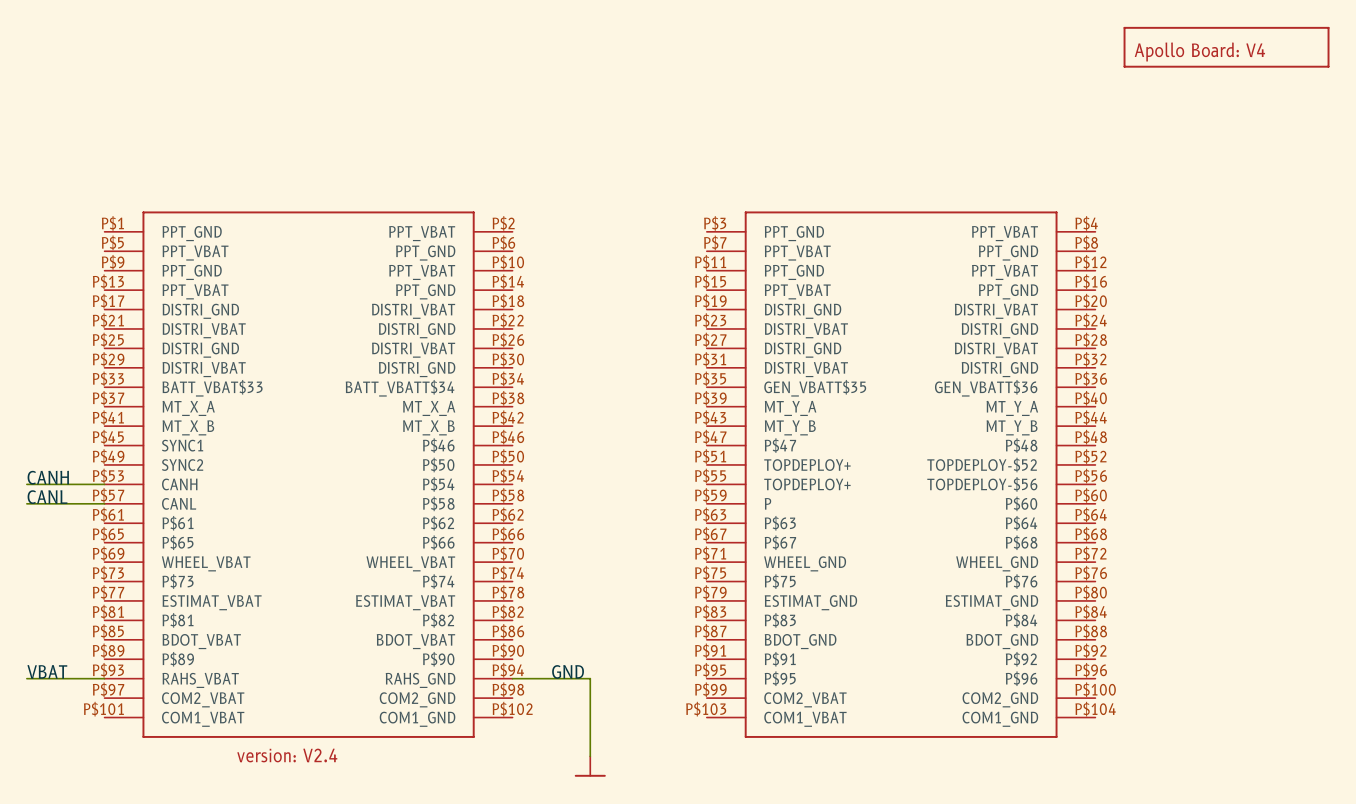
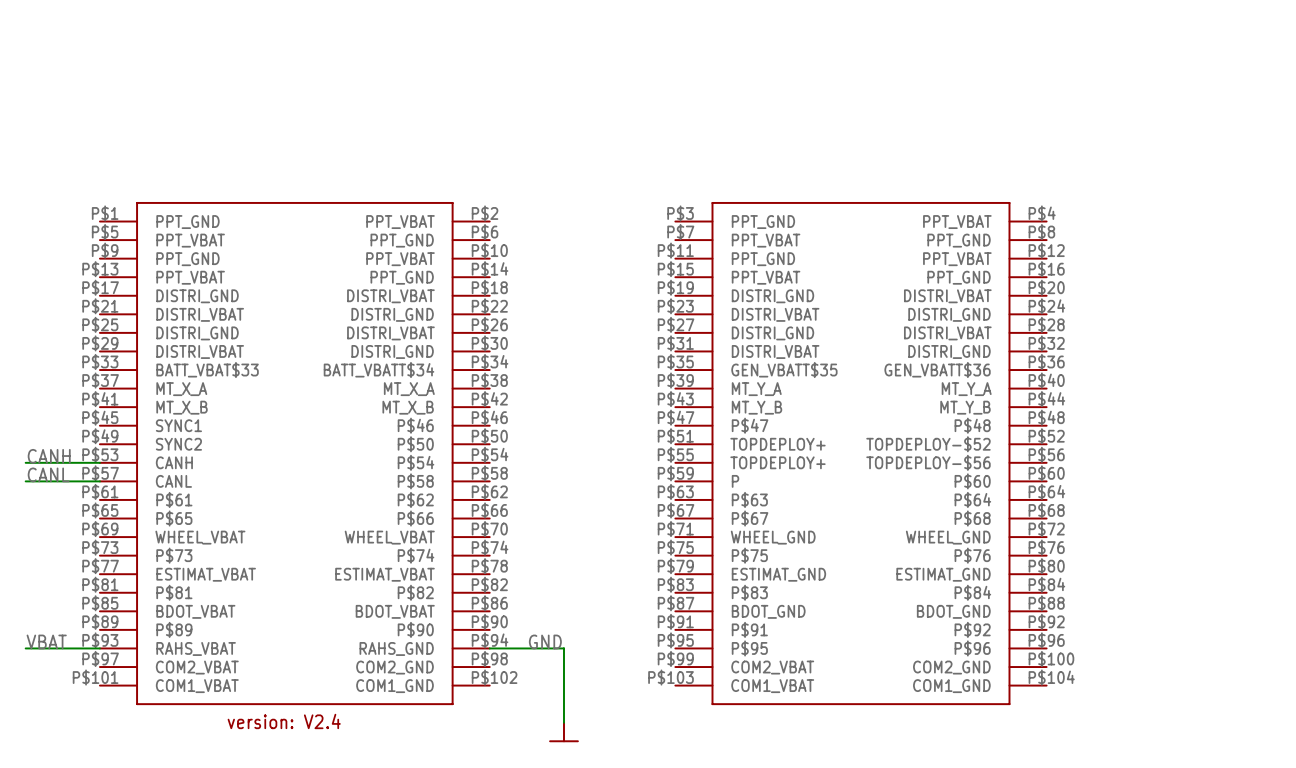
part: (1226, 47) -> none

